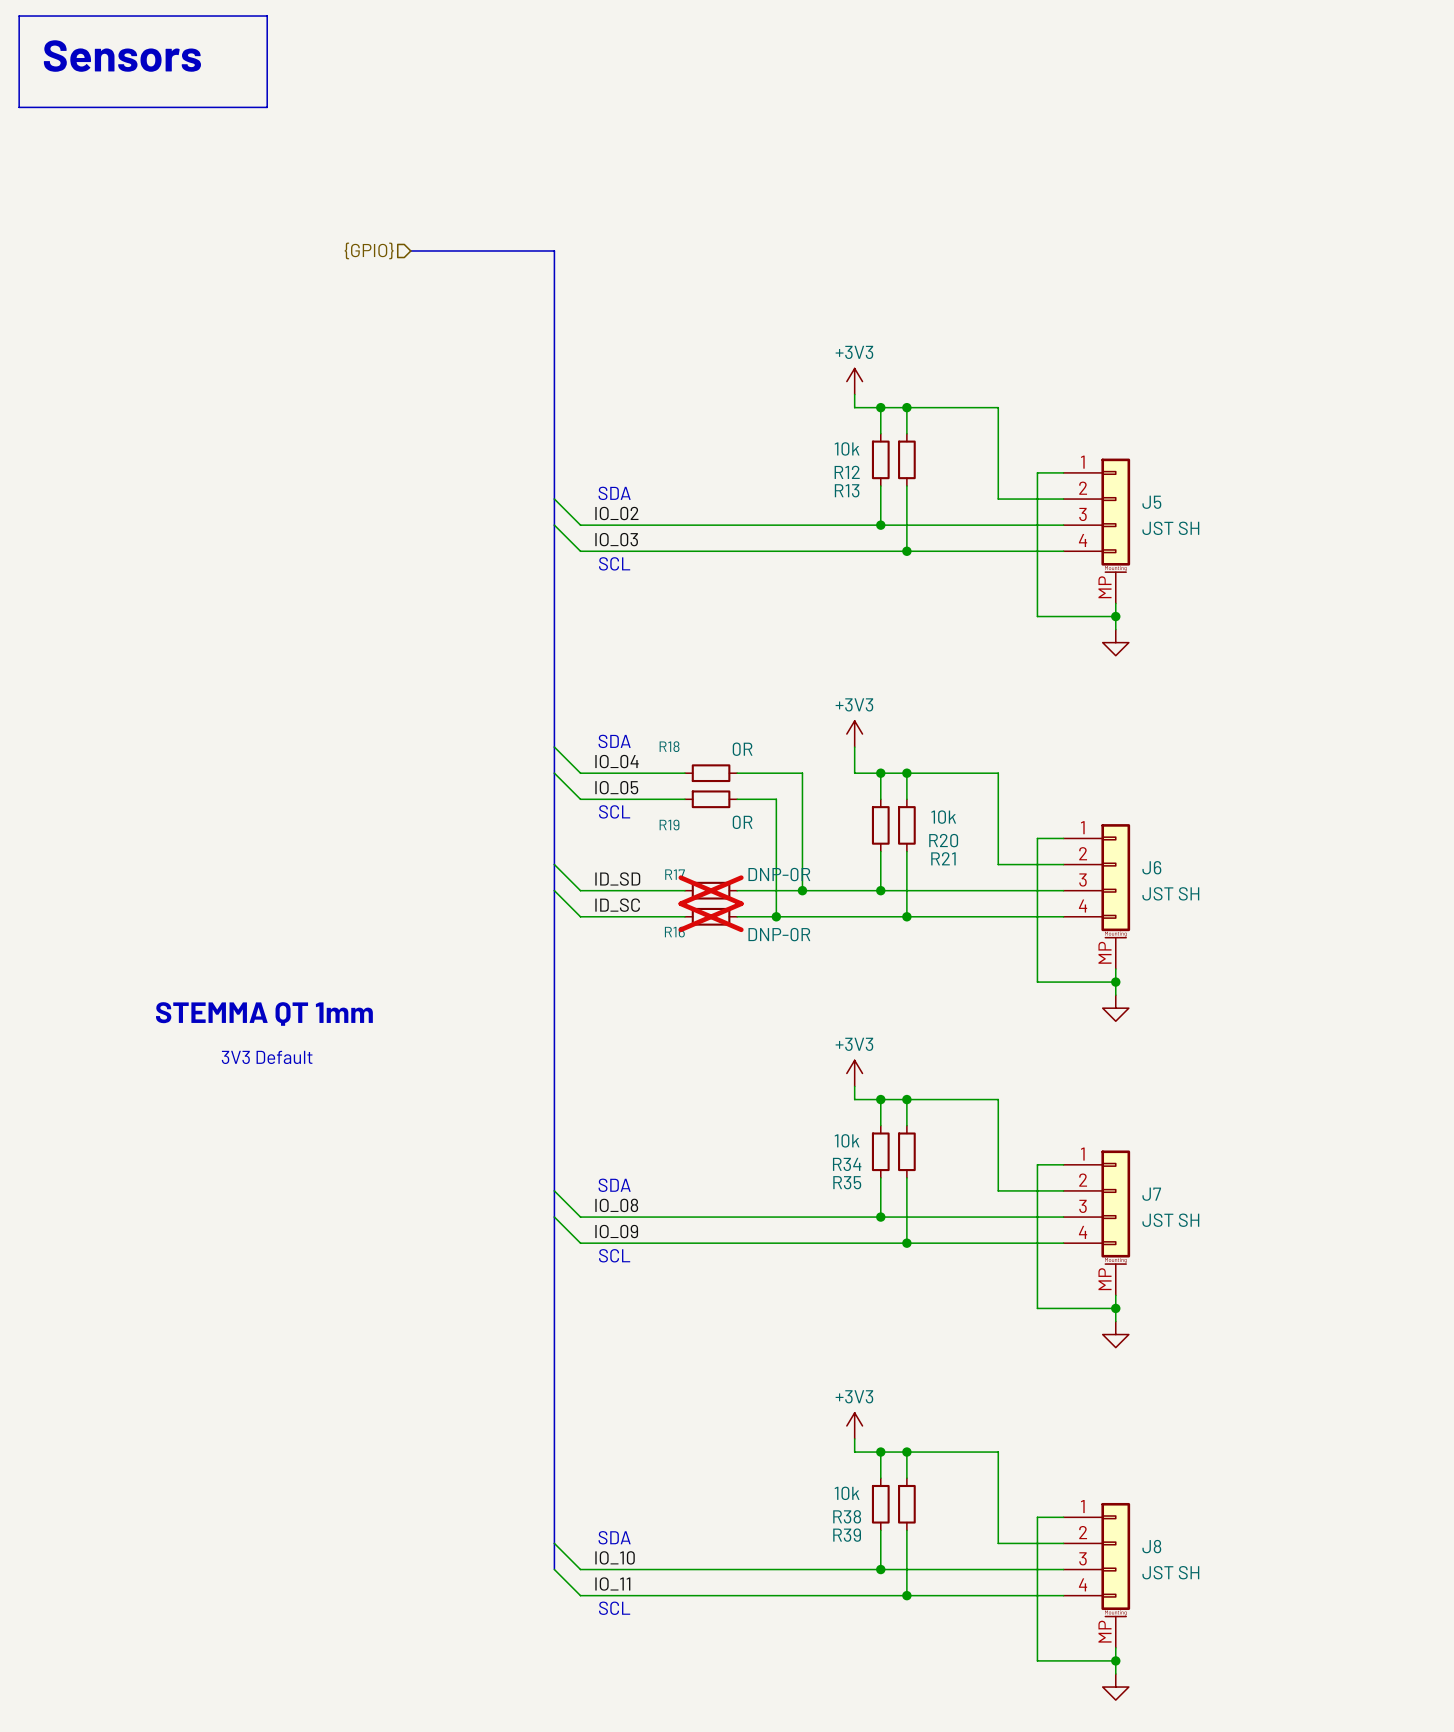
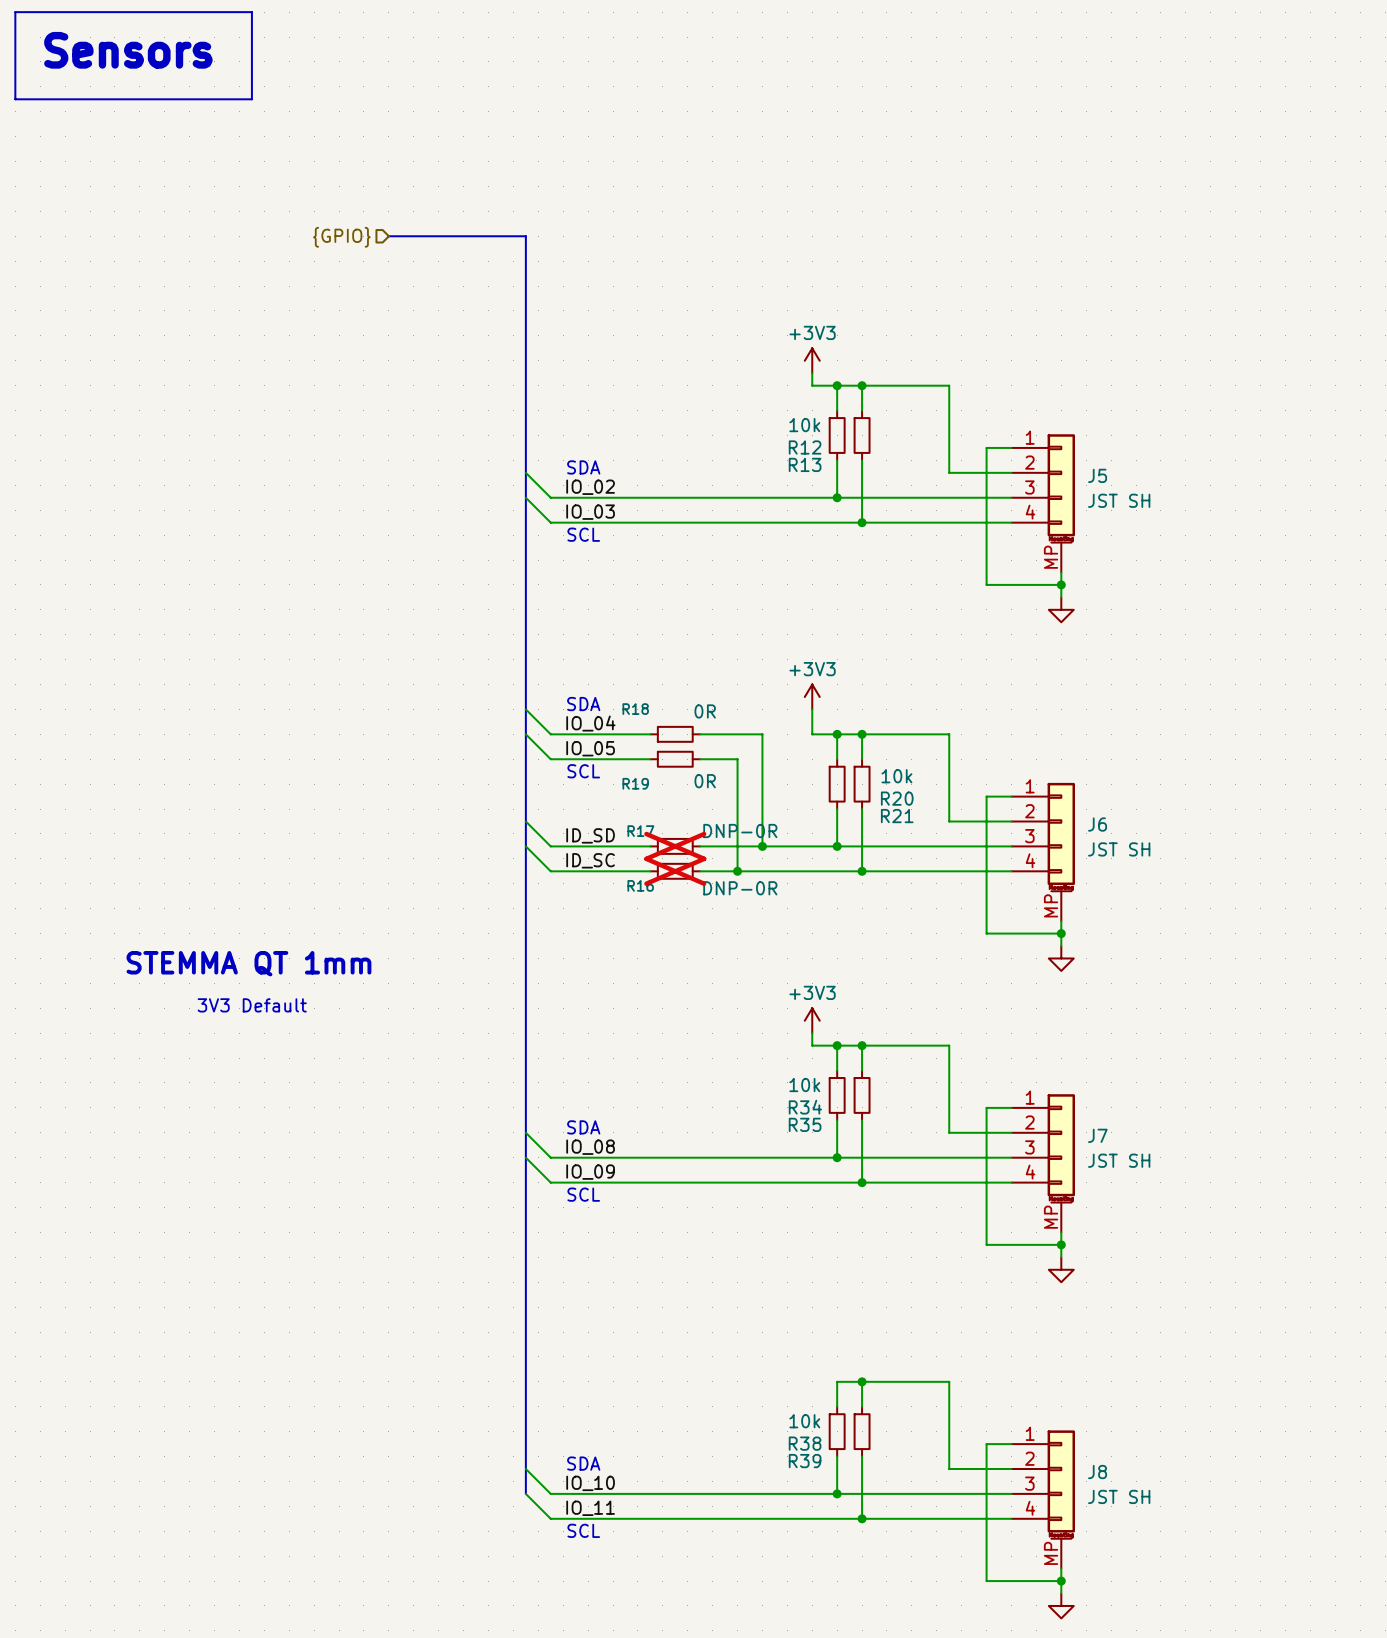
power symbol: +3V3 (854, 1425) -> none
wire: (854, 1438) (854, 1452) (880, 1452) -> none
junction: (880, 1452) -> none

